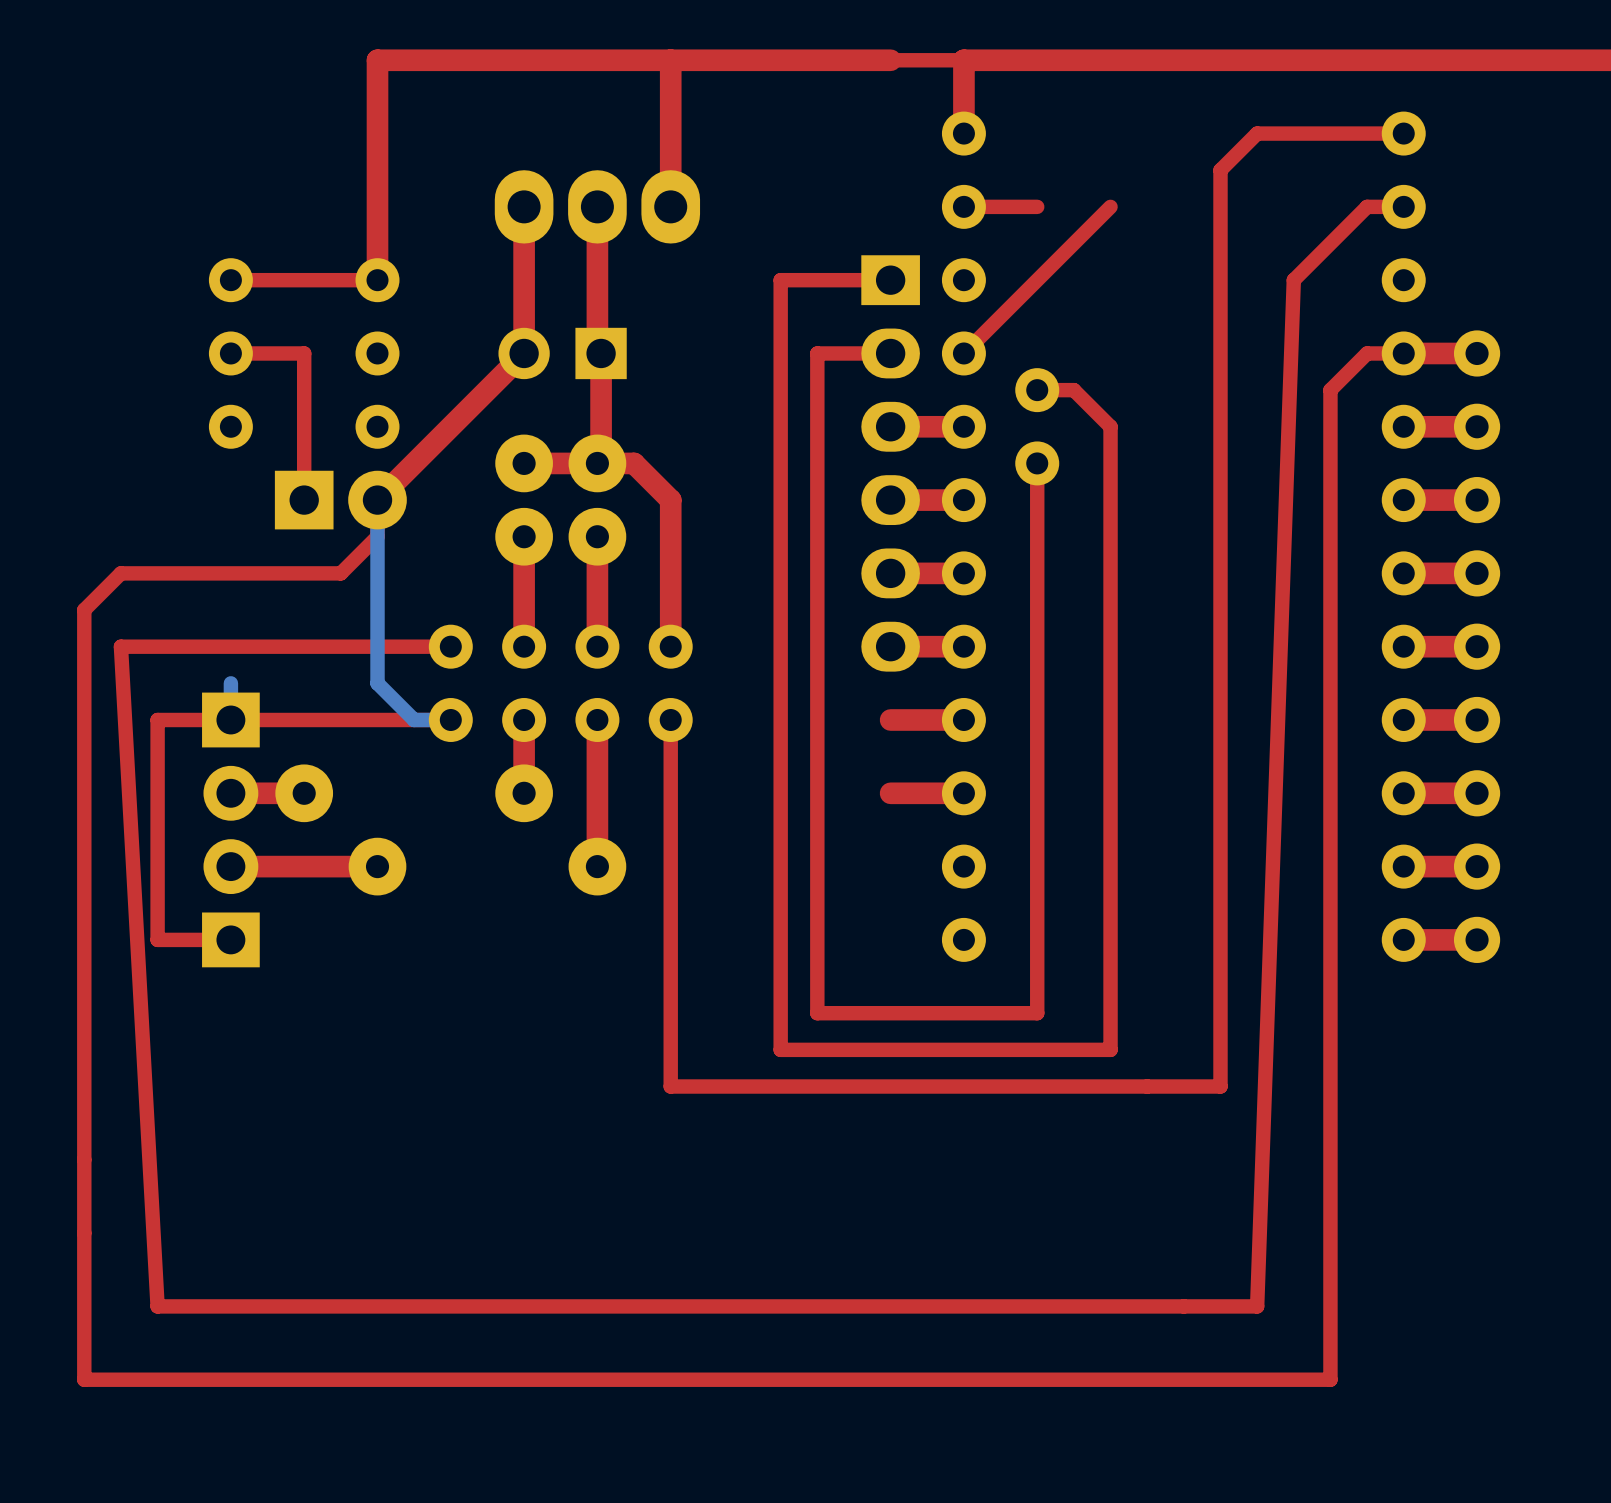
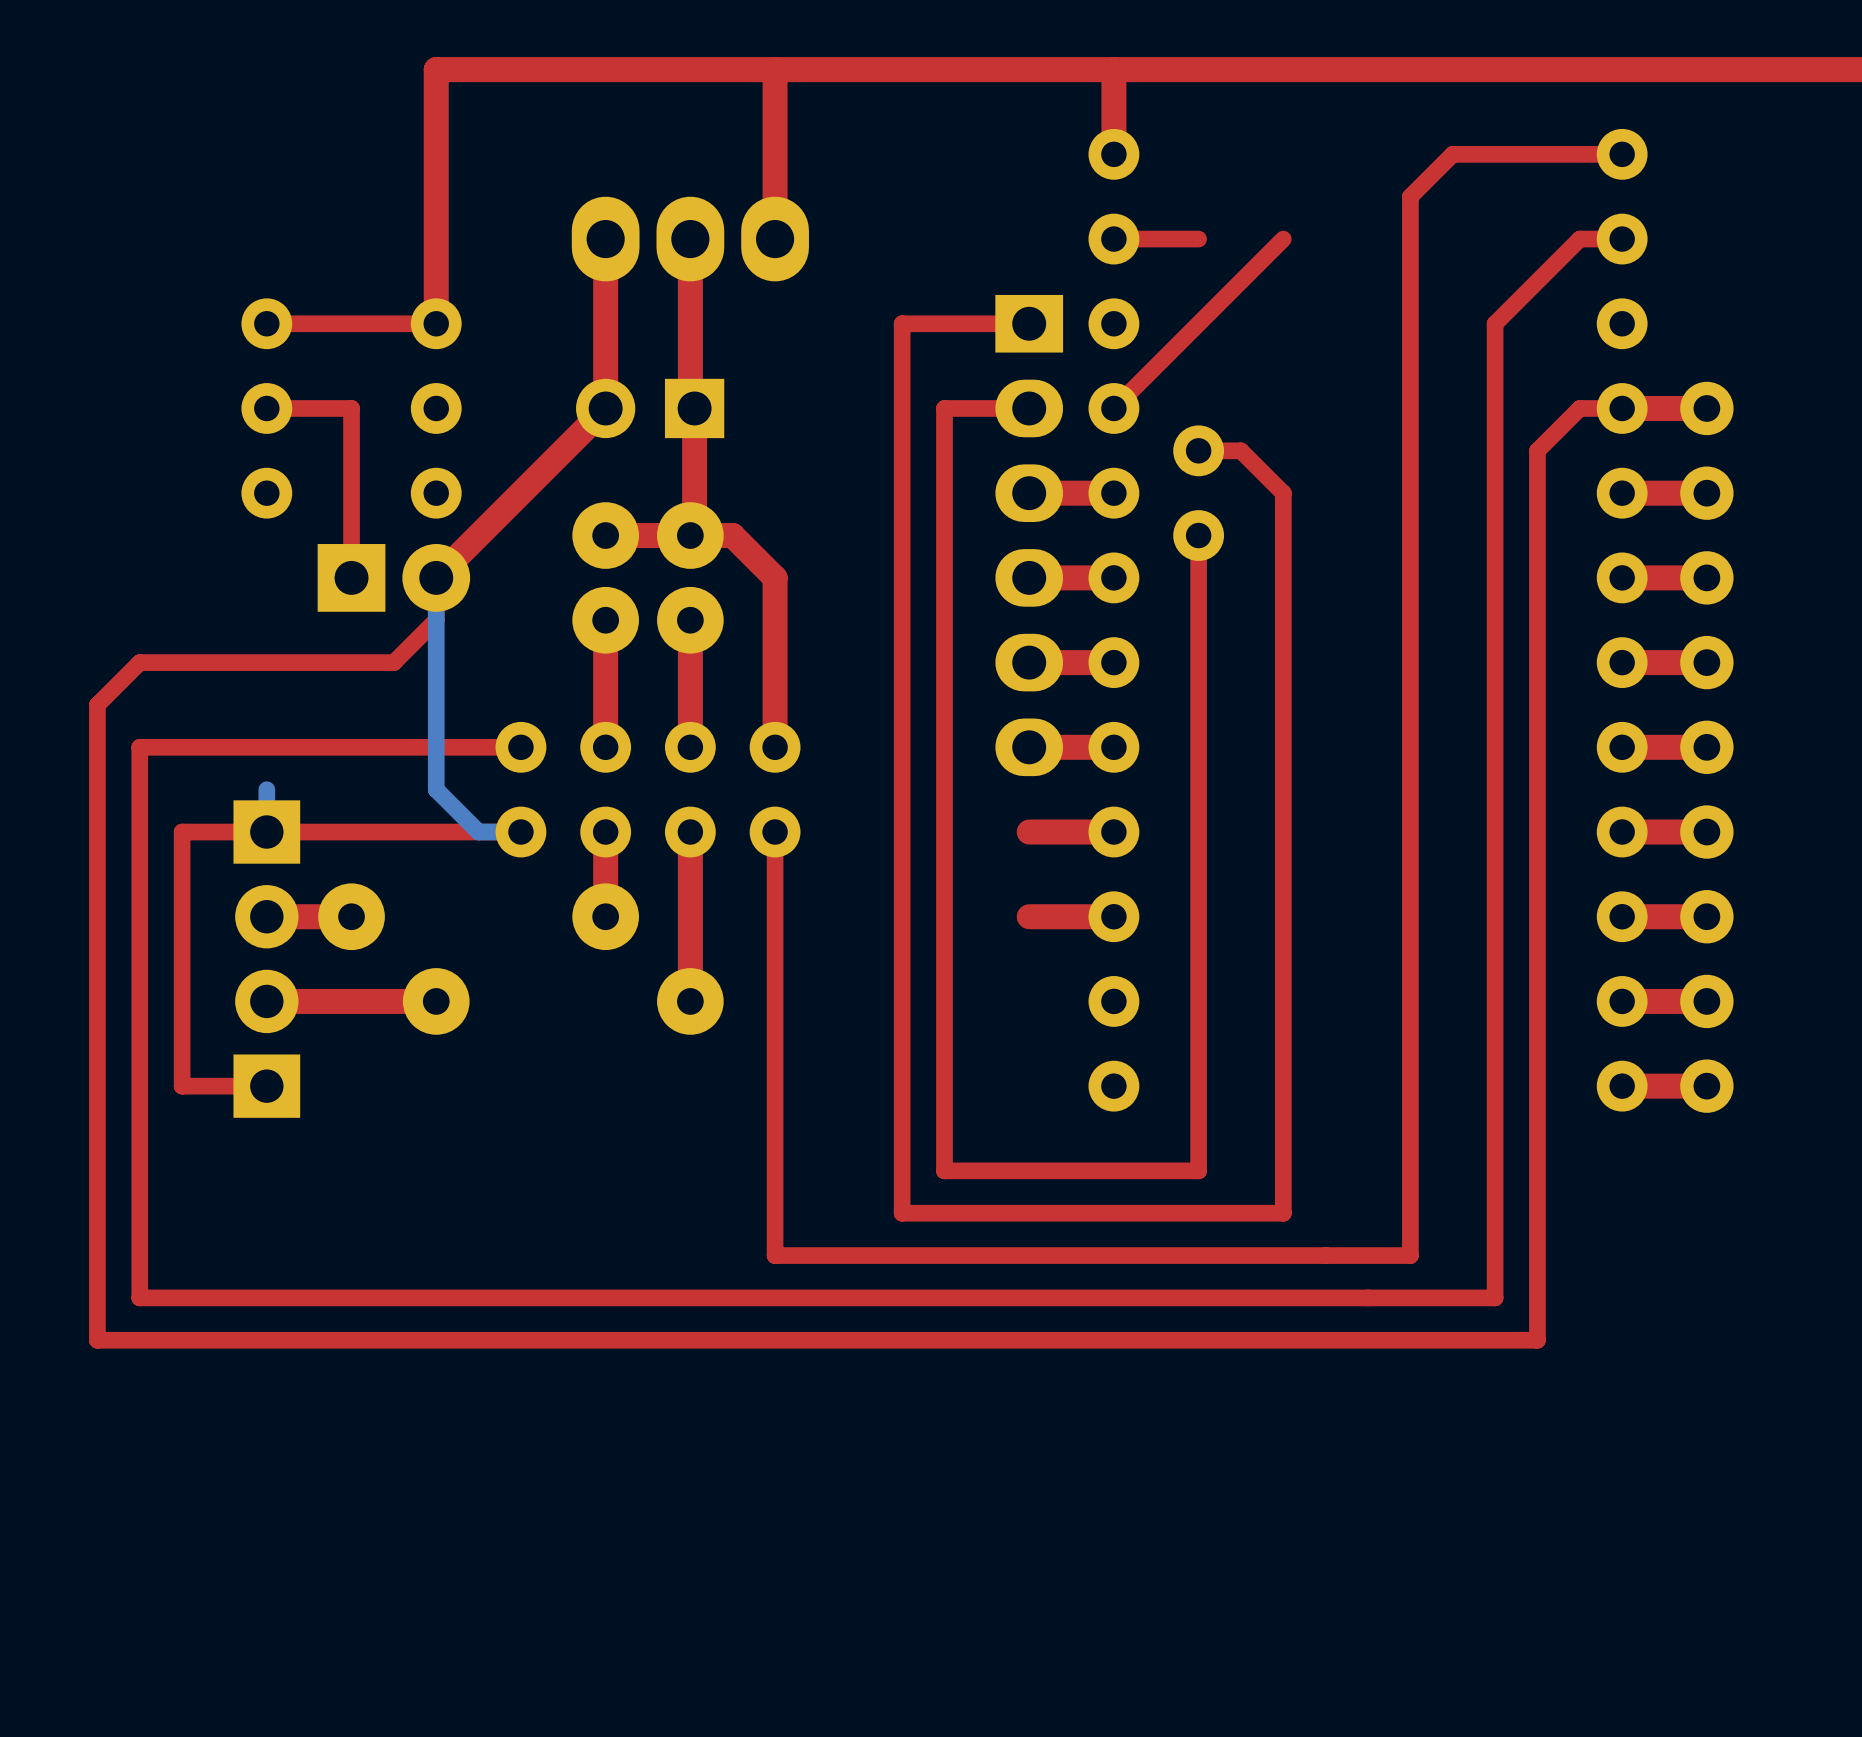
top track width: thin (963, 60) (890, 60) -> thick (1113, 69) (1029, 69)
top track: (1293, 280) (1257, 1306) (157, 1306) (120, 646) -> (1495, 323) (1495, 1297) (139, 1297) (139, 747)
top track: (1330, 1159) (1330, 1379) (84, 1379) (84, 1159) -> (1537, 1340) (97, 1340)

